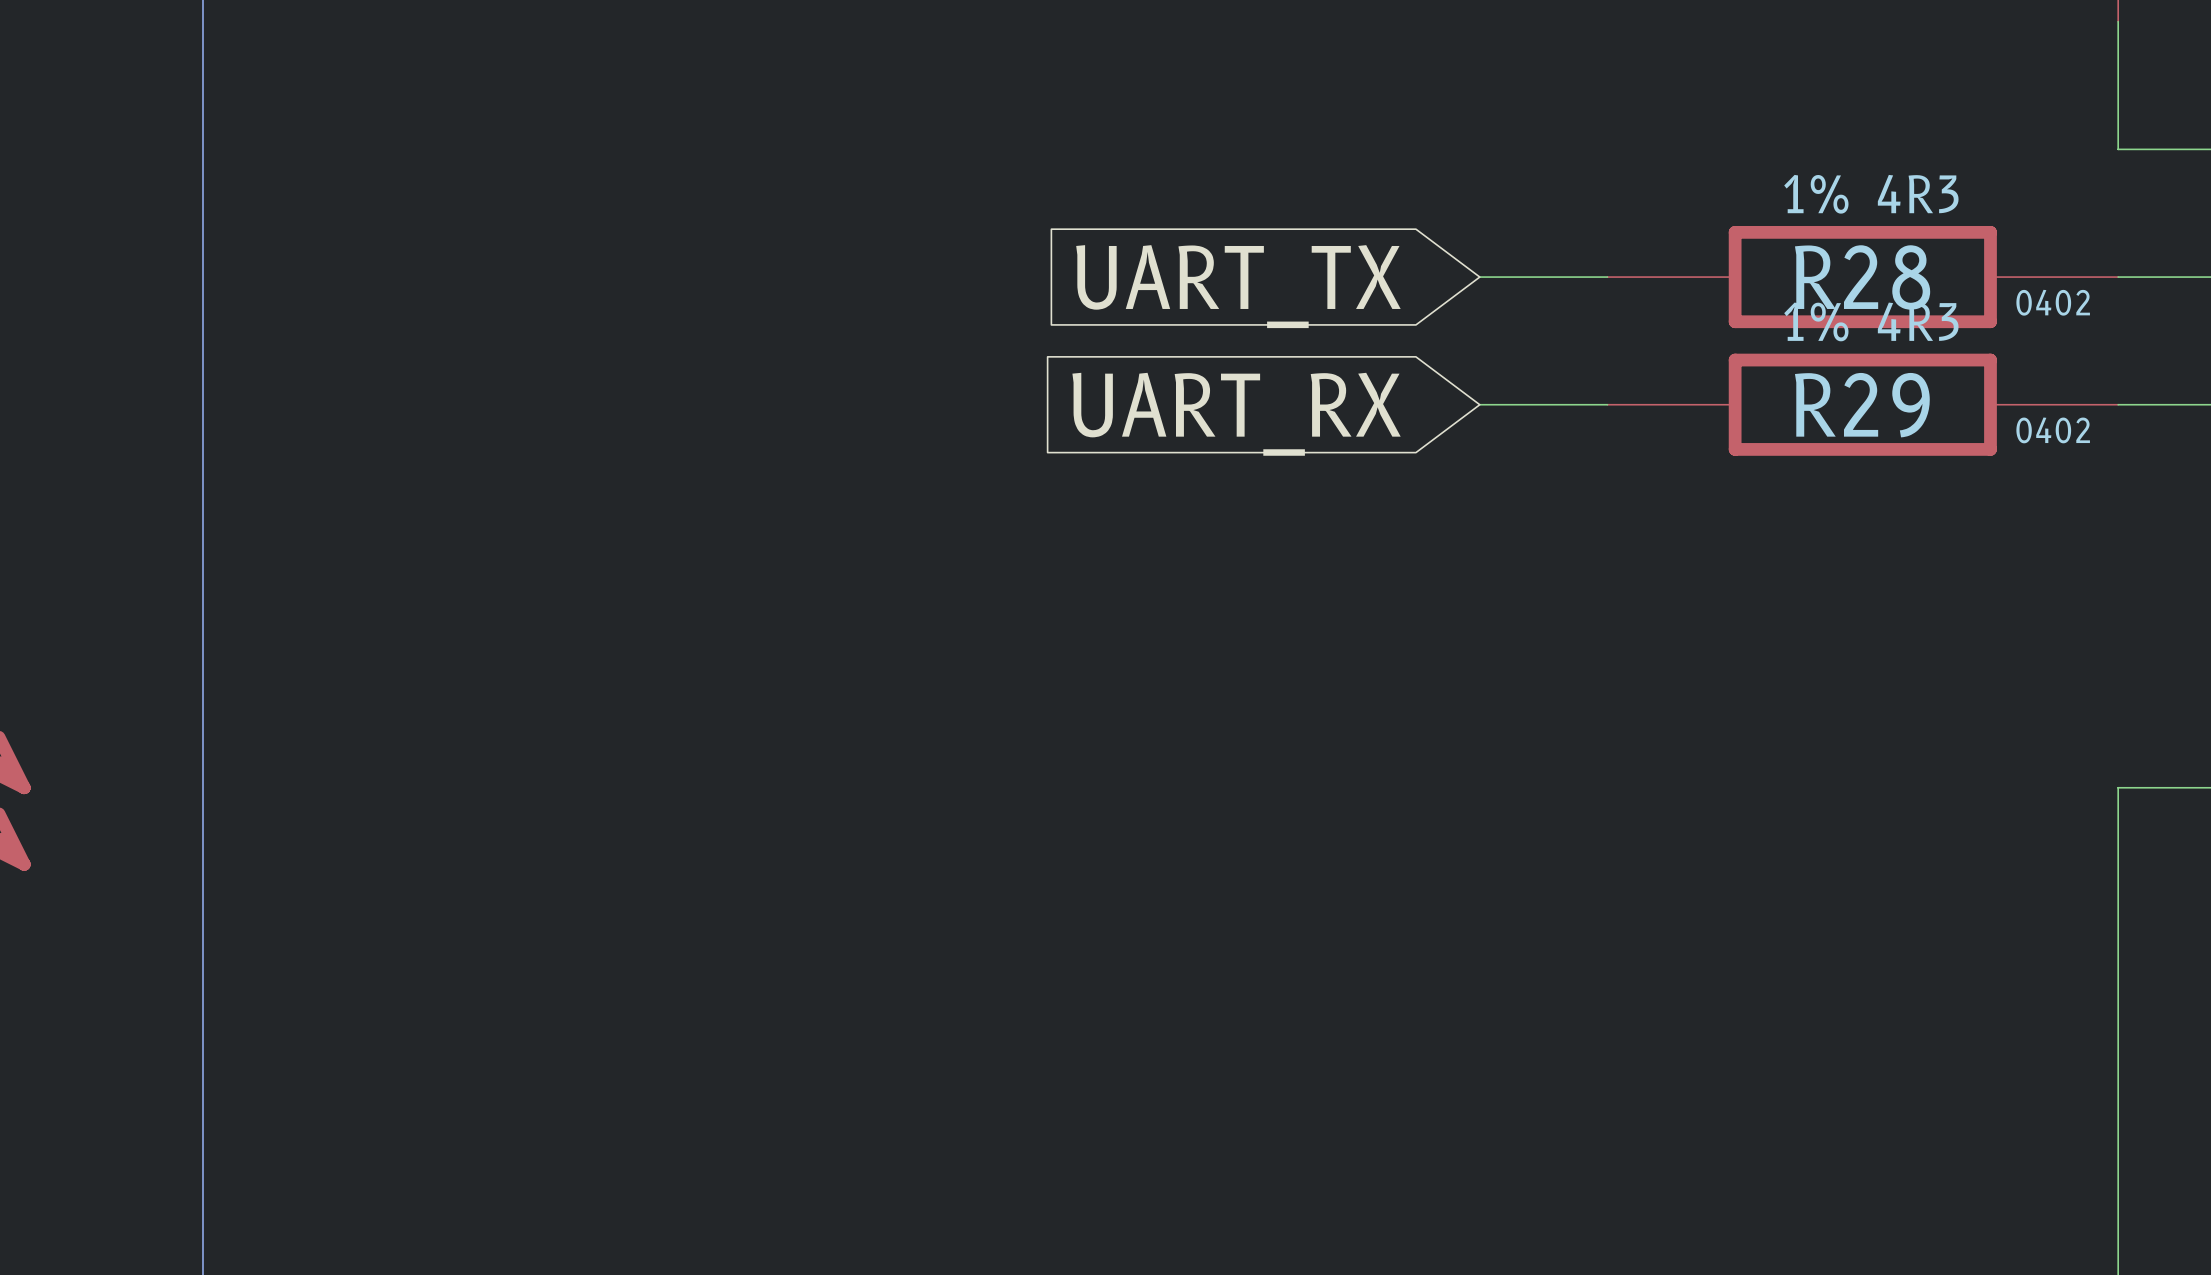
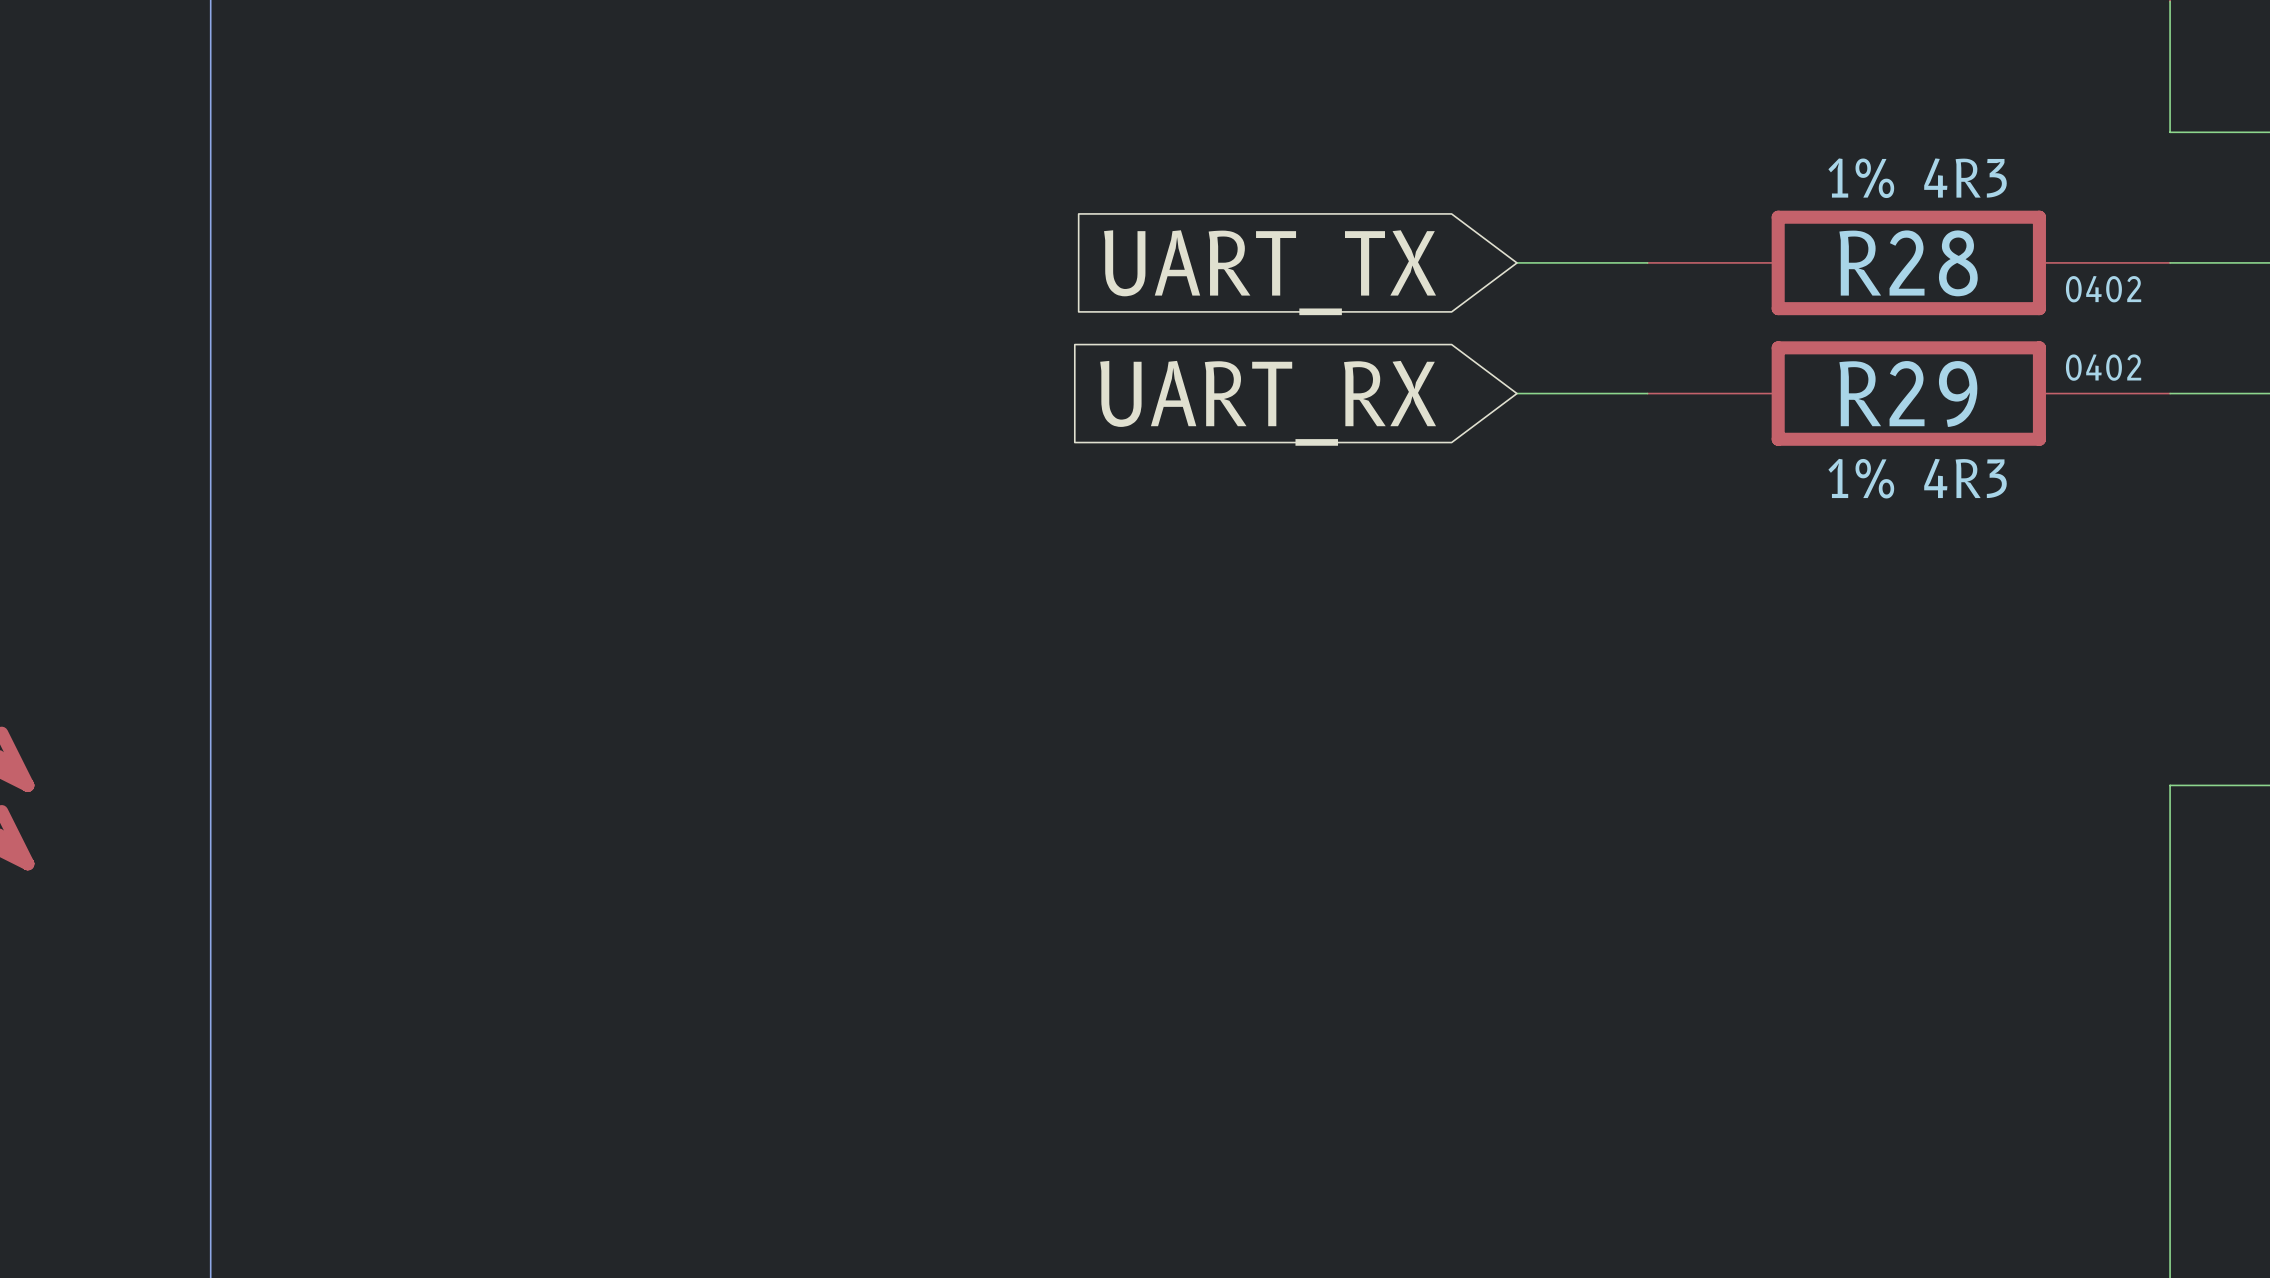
R29 text position: 1% (1816, 321) -> 1% (1861, 478)
R29 value position: 4R3 (1918, 321) -> 4R3 (1965, 478)
R29 text position: 0402 (2053, 430) -> 0402 (2103, 367)

